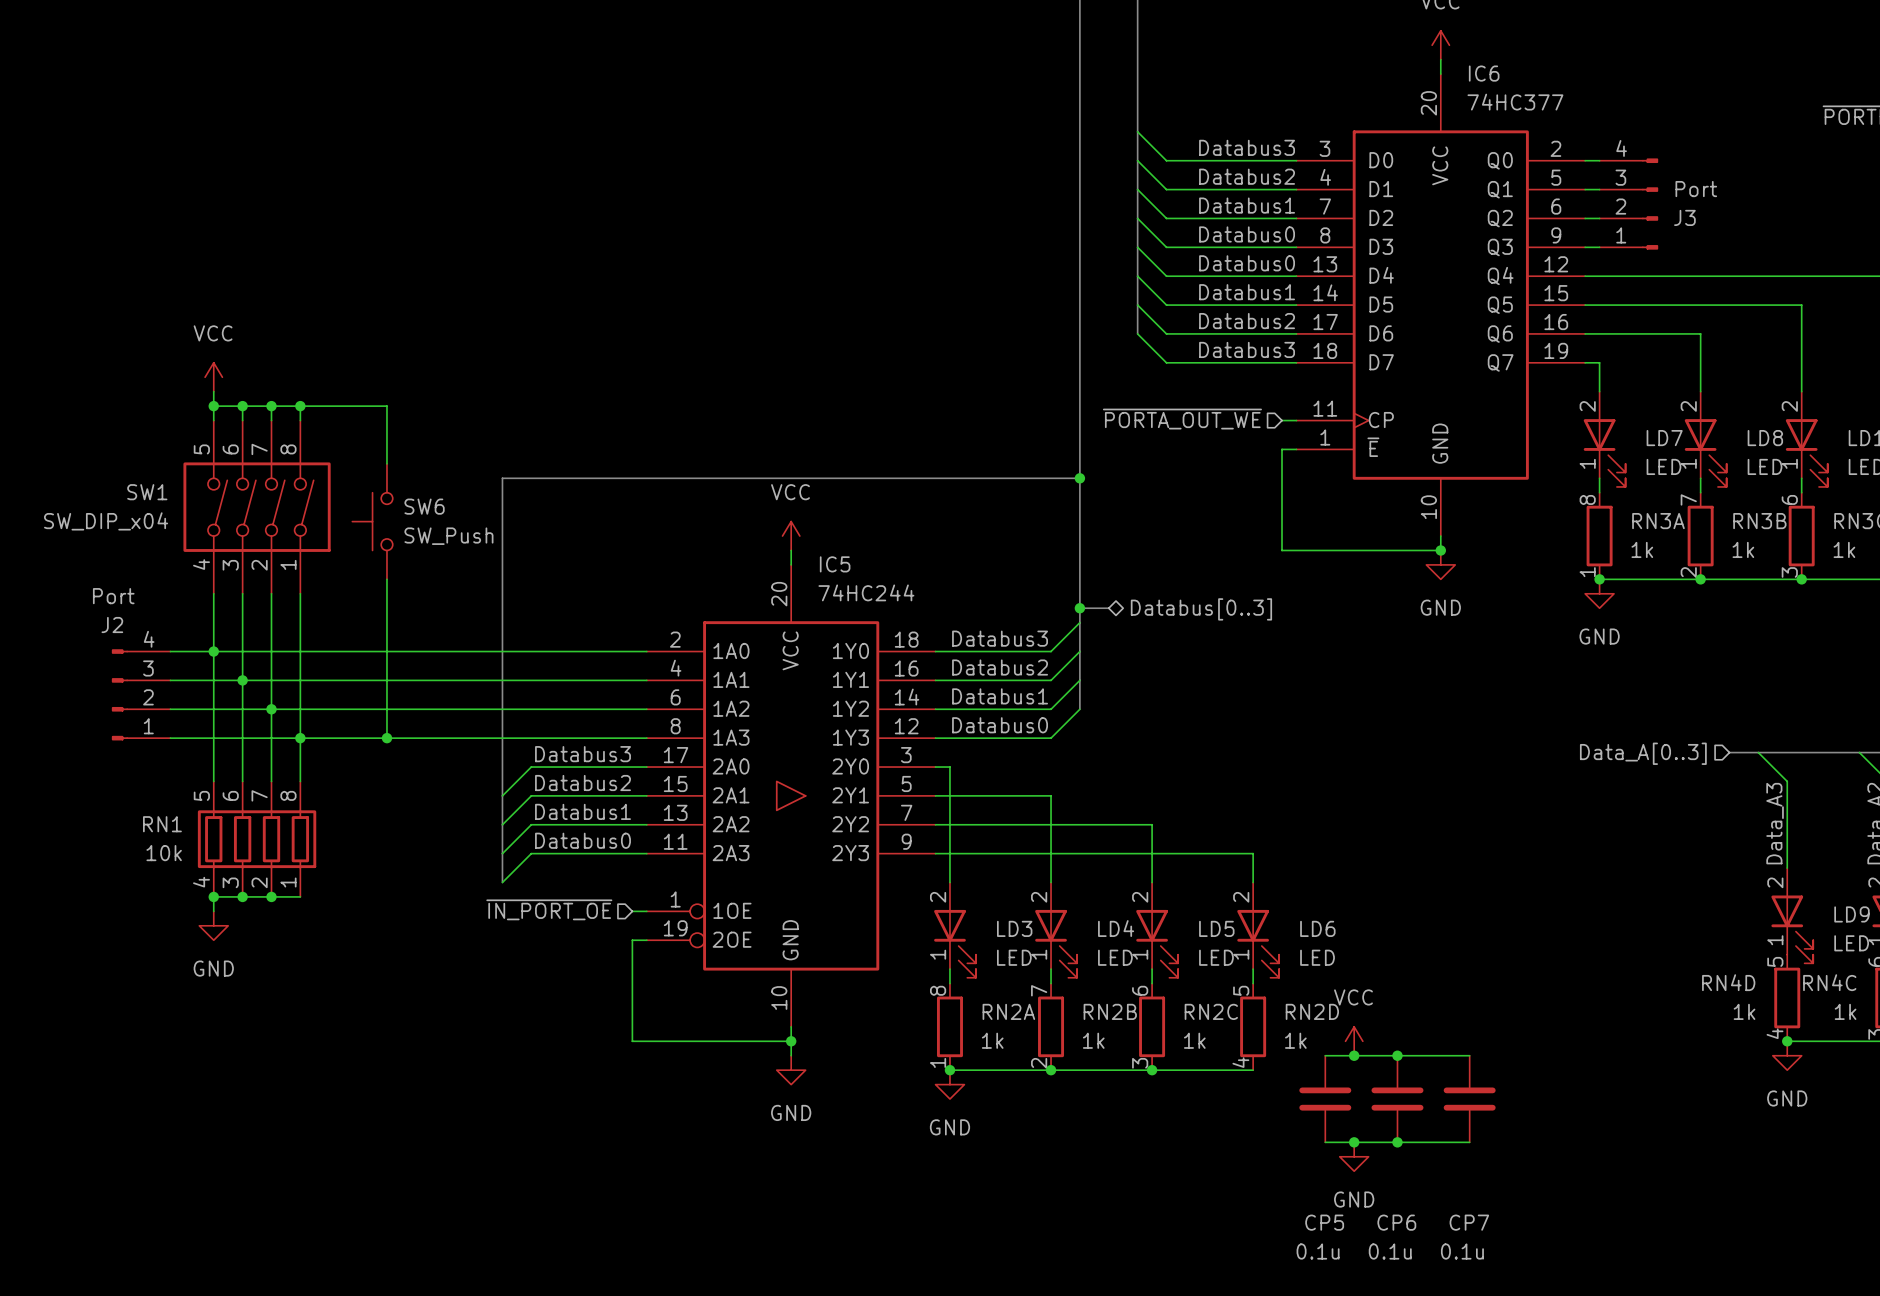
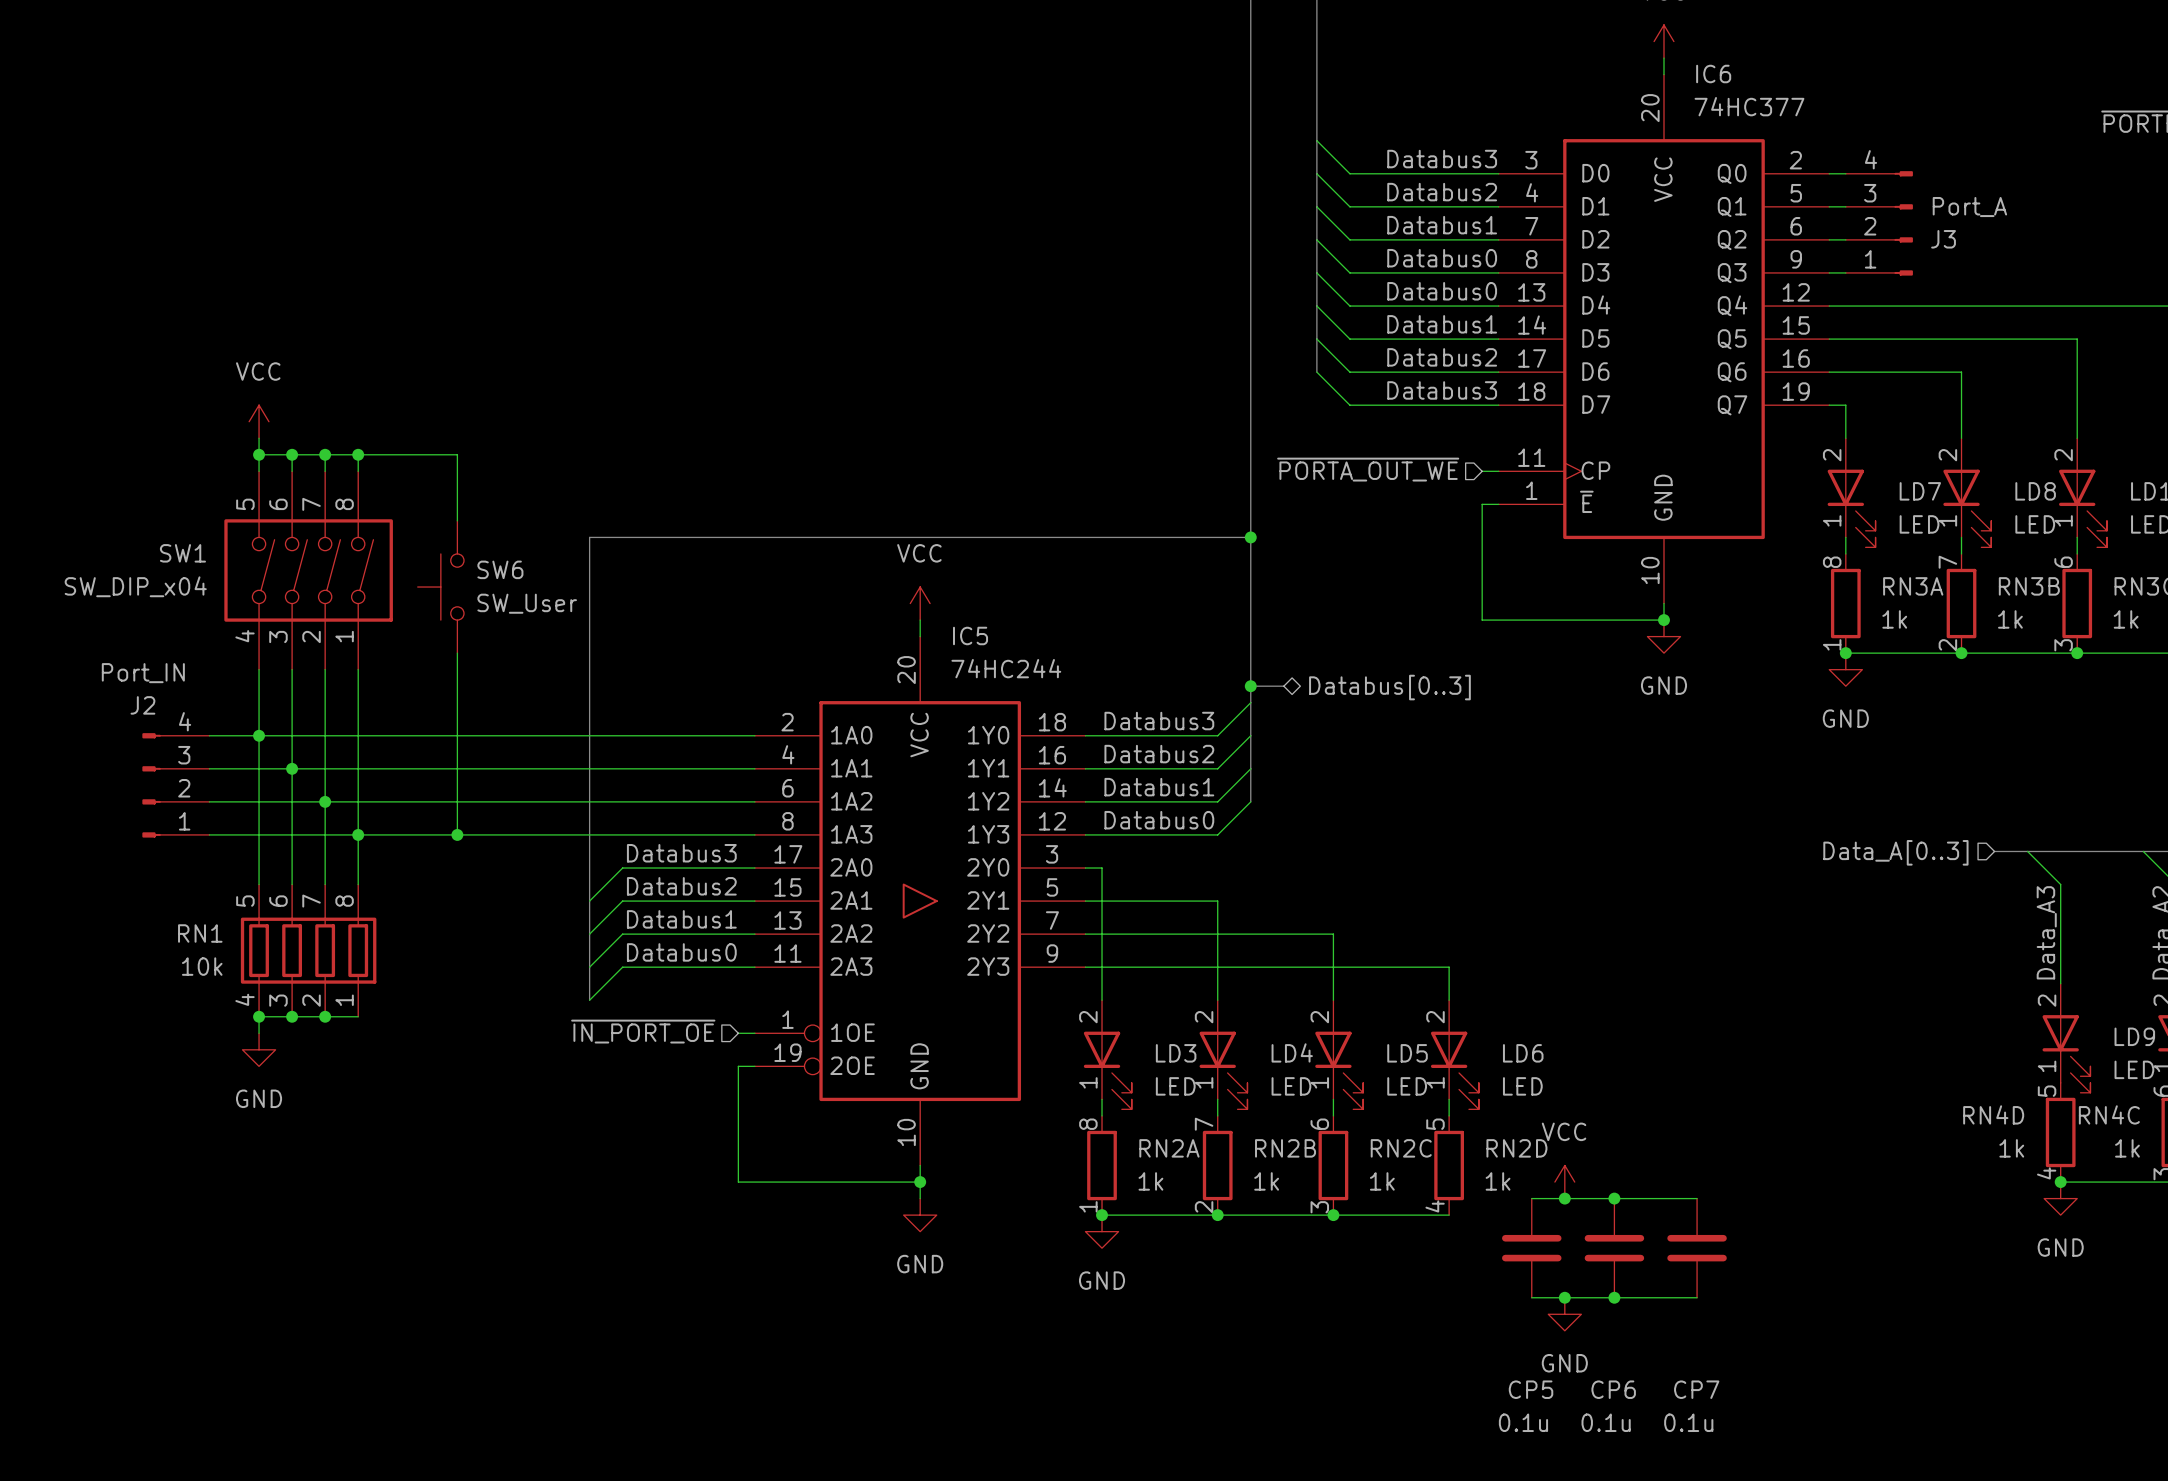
J3 value: Port (1696, 189) -> Port_A (1969, 207)
SW6 value: SW_Push (448, 536) -> SW_User (527, 603)
J2 value: Port (113, 596) -> Port_IN (143, 673)

